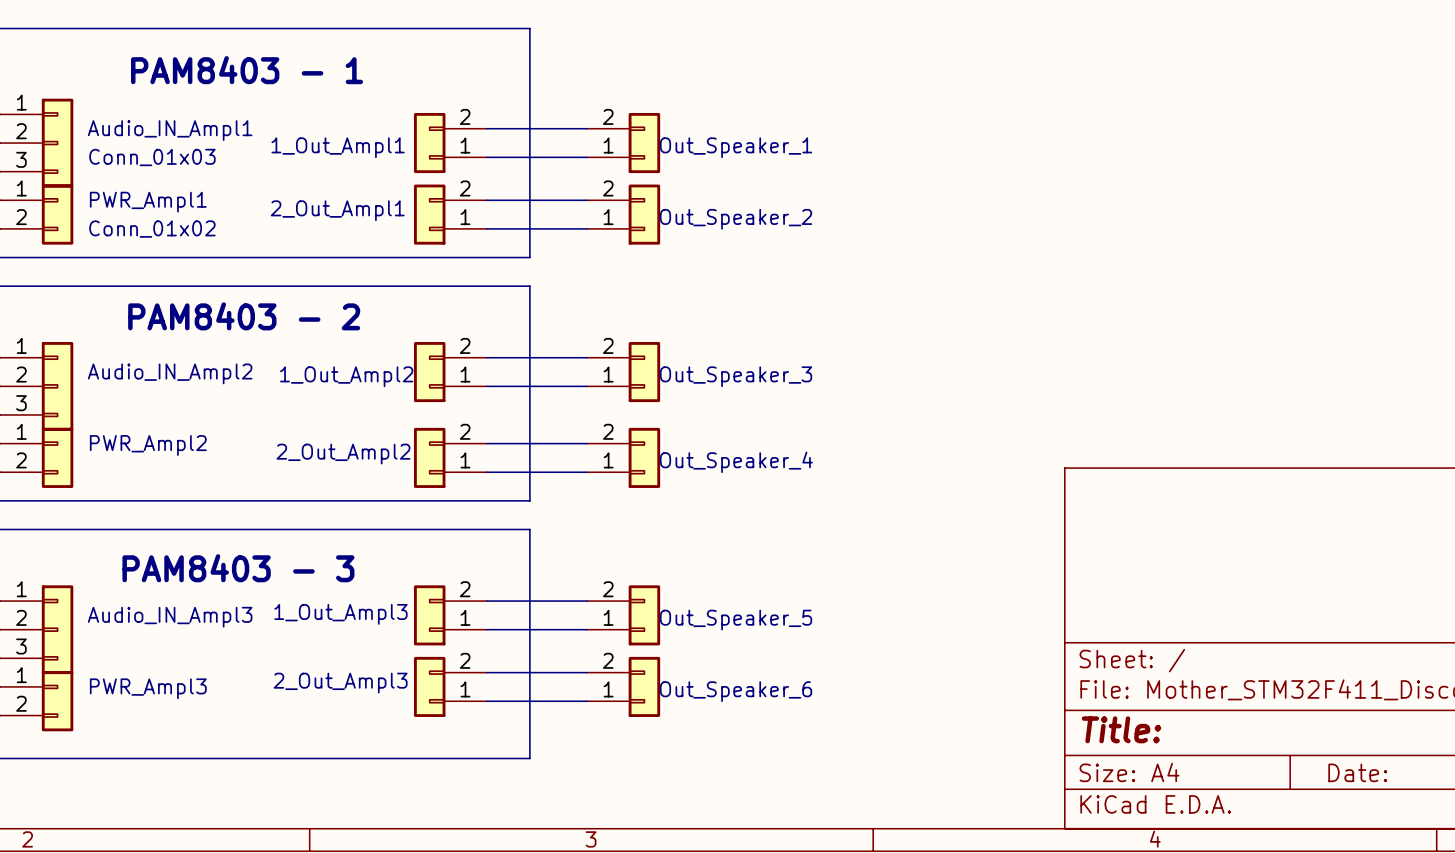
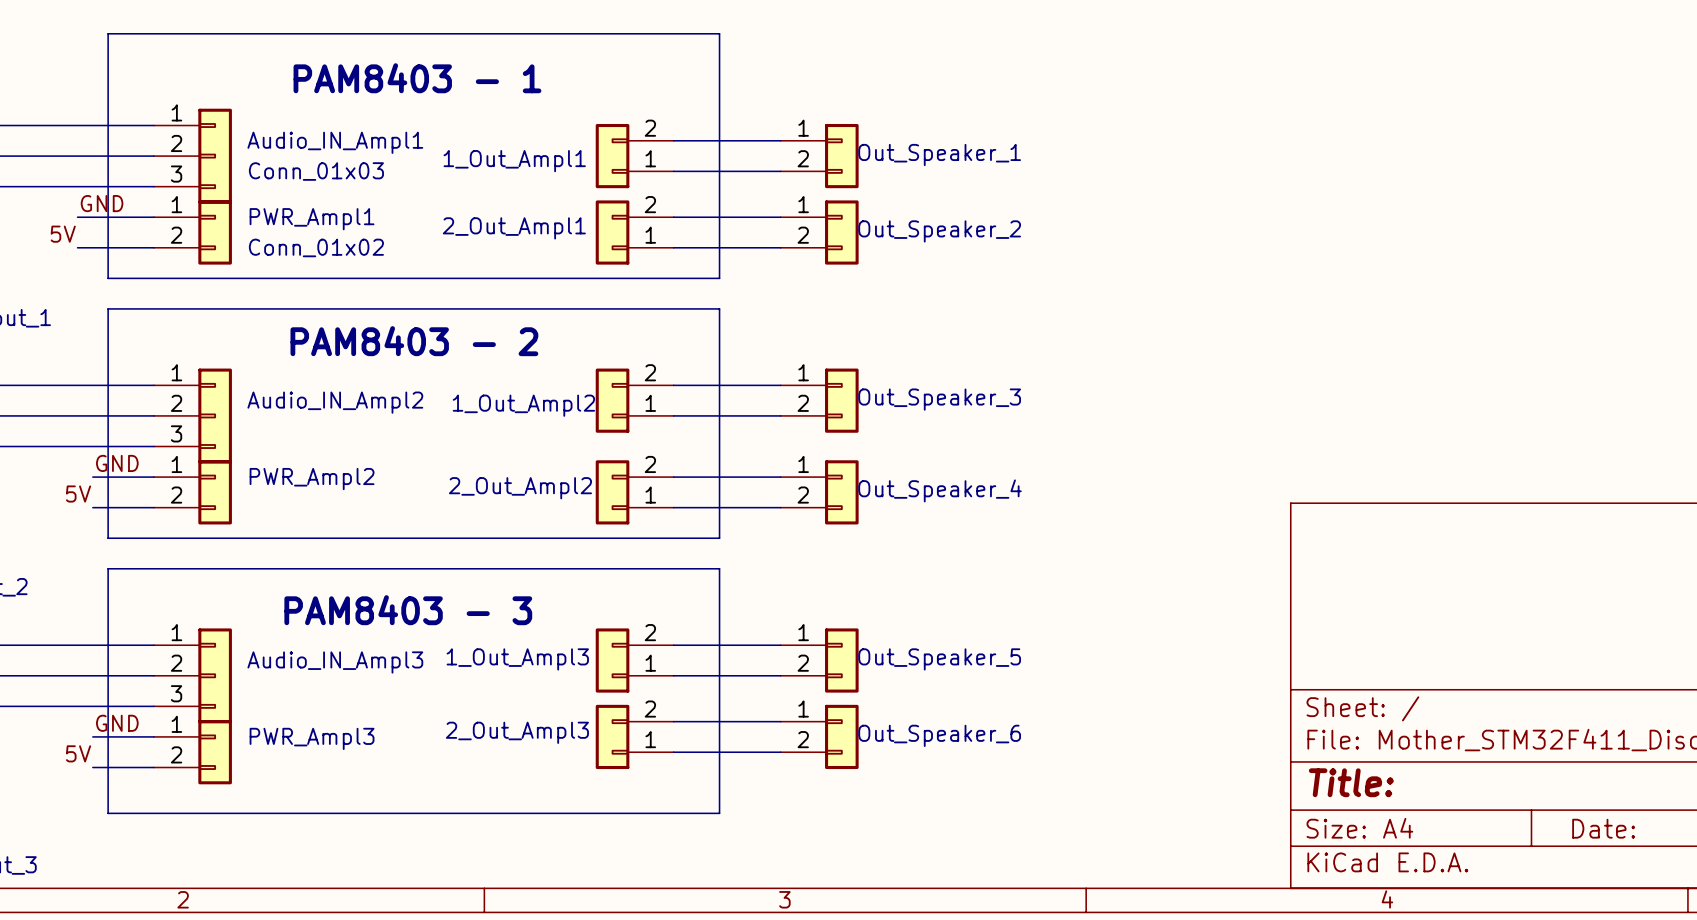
Out_Speaker_1 flip: as is (644, 143) -> up-down (841, 156)
Out_Speaker_2 flip: as is (644, 214) -> up-down (841, 232)
Out_Speaker_3 flip: as is (644, 372) -> up-down (841, 400)
Out_Speaker_4 flip: as is (644, 457) -> up-down (841, 492)
Out_Speaker_5 flip: as is (644, 615) -> up-down (841, 660)
Out_Speaker_6 flip: as is (644, 686) -> up-down (841, 736)

